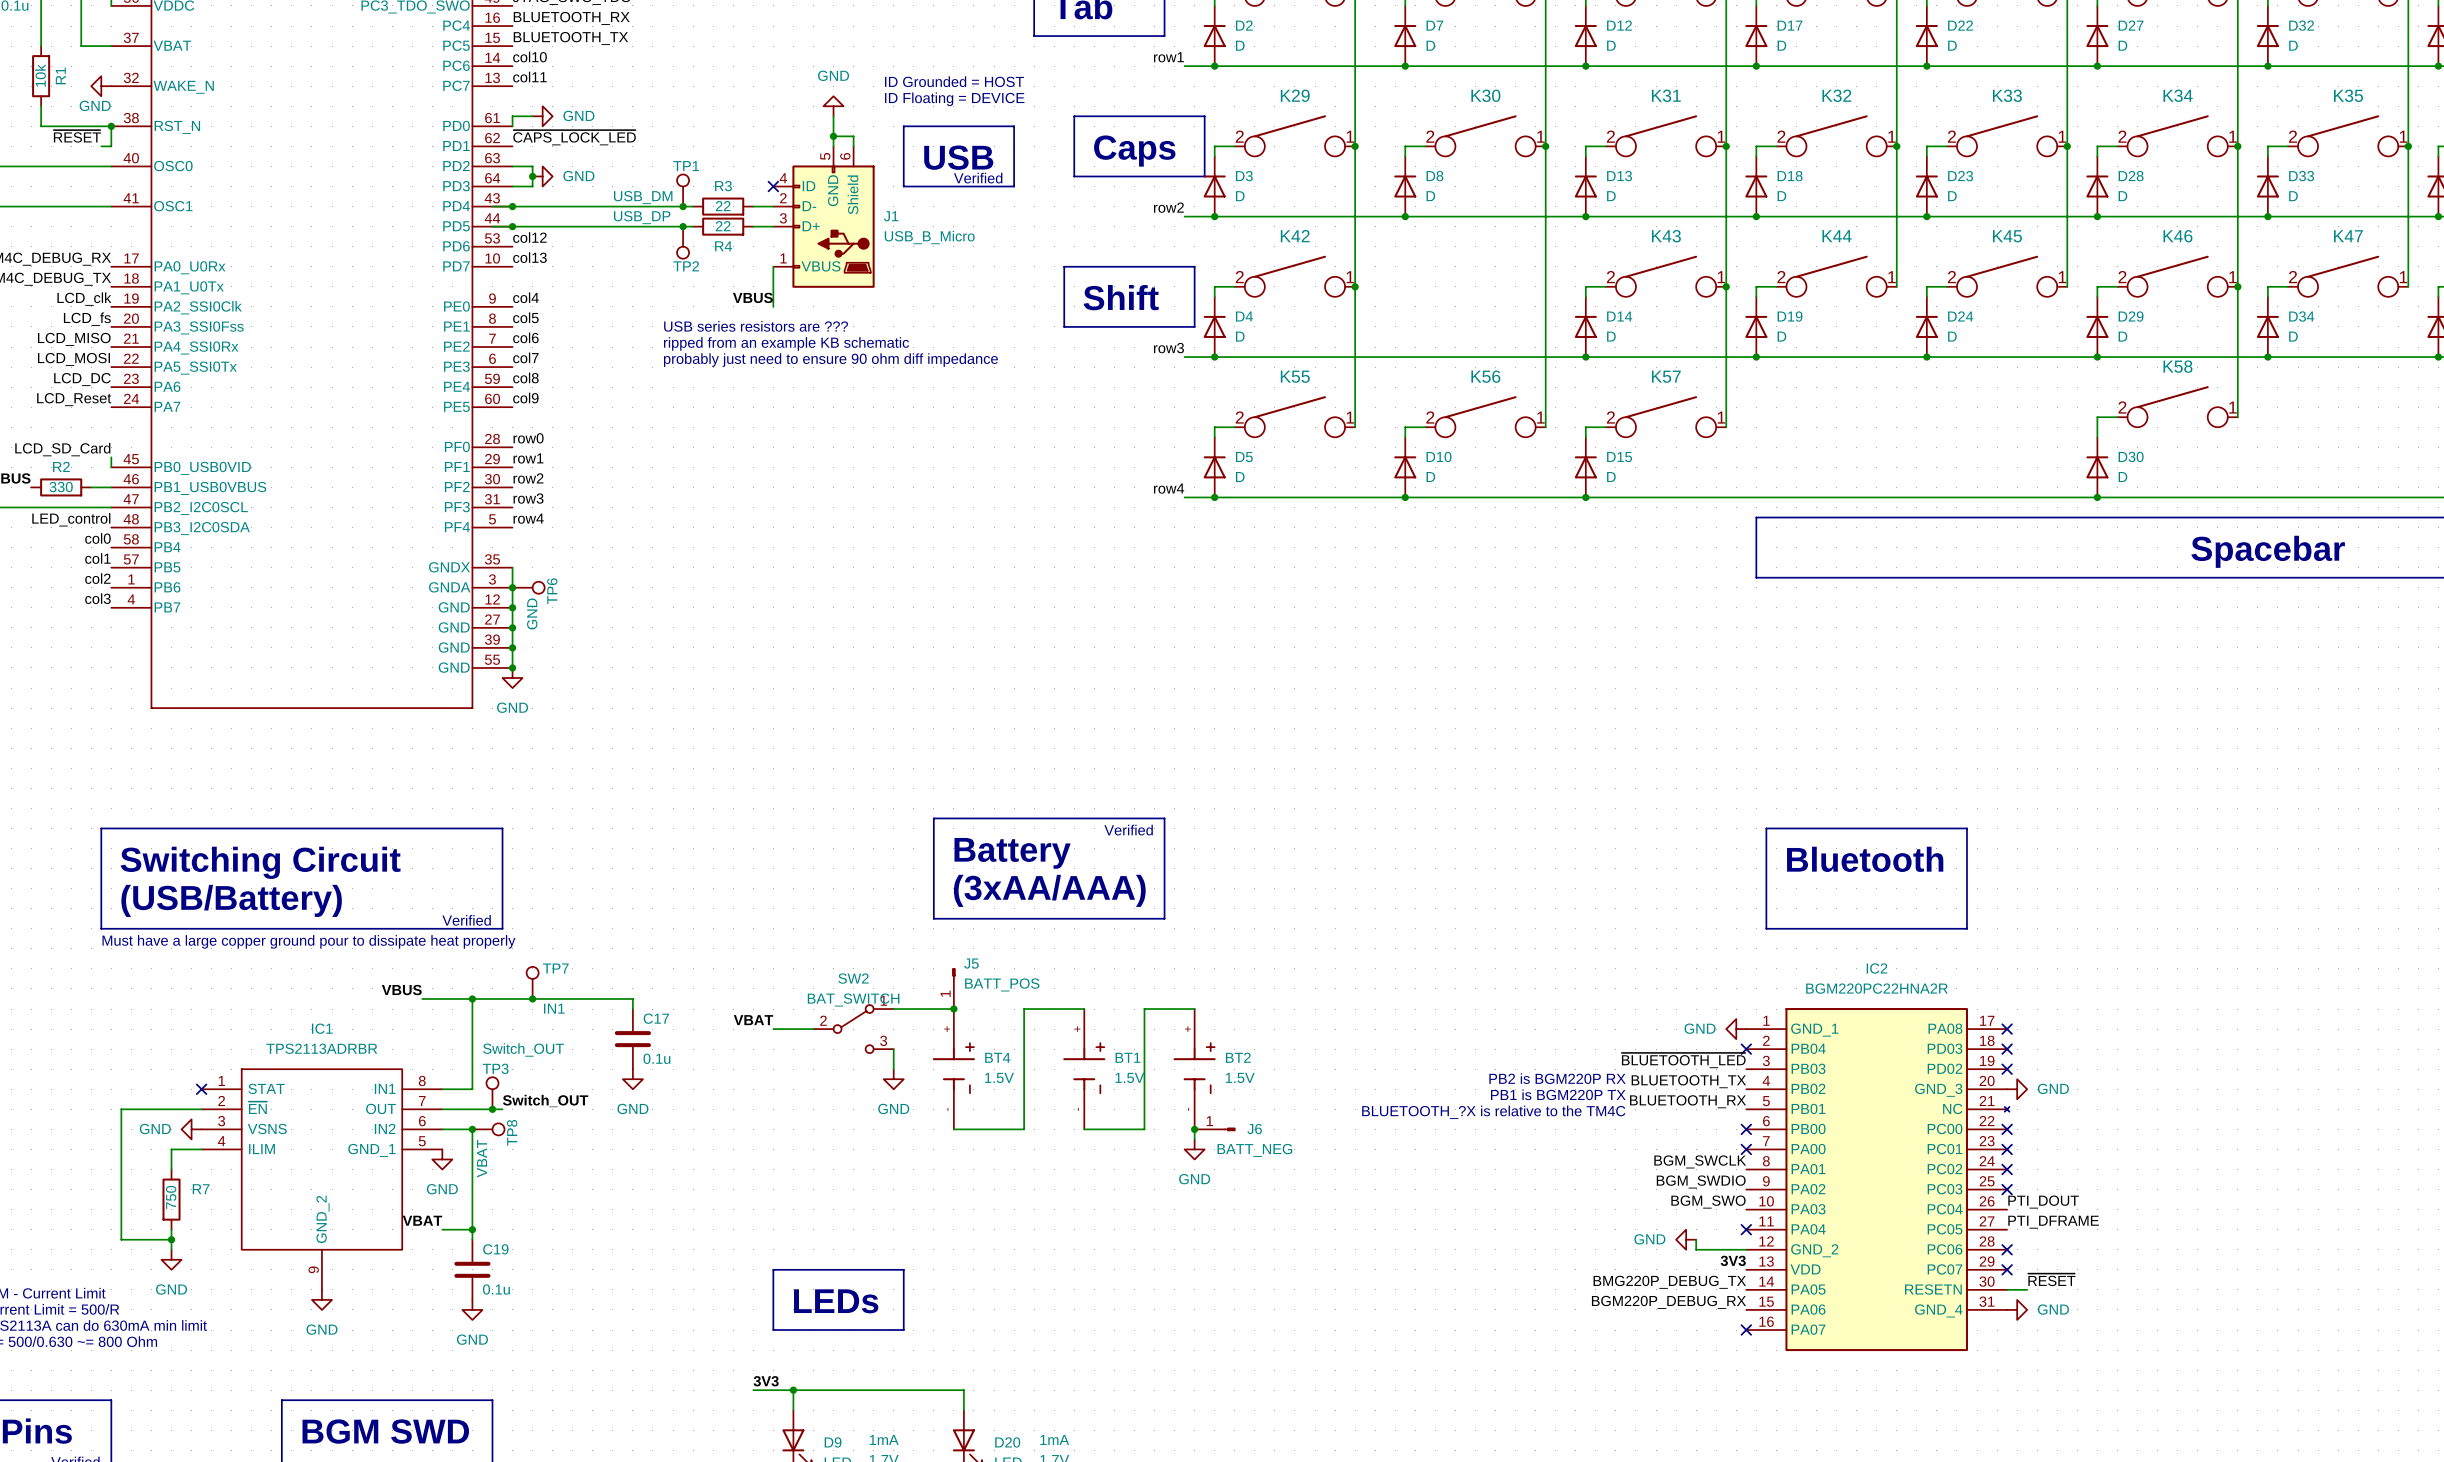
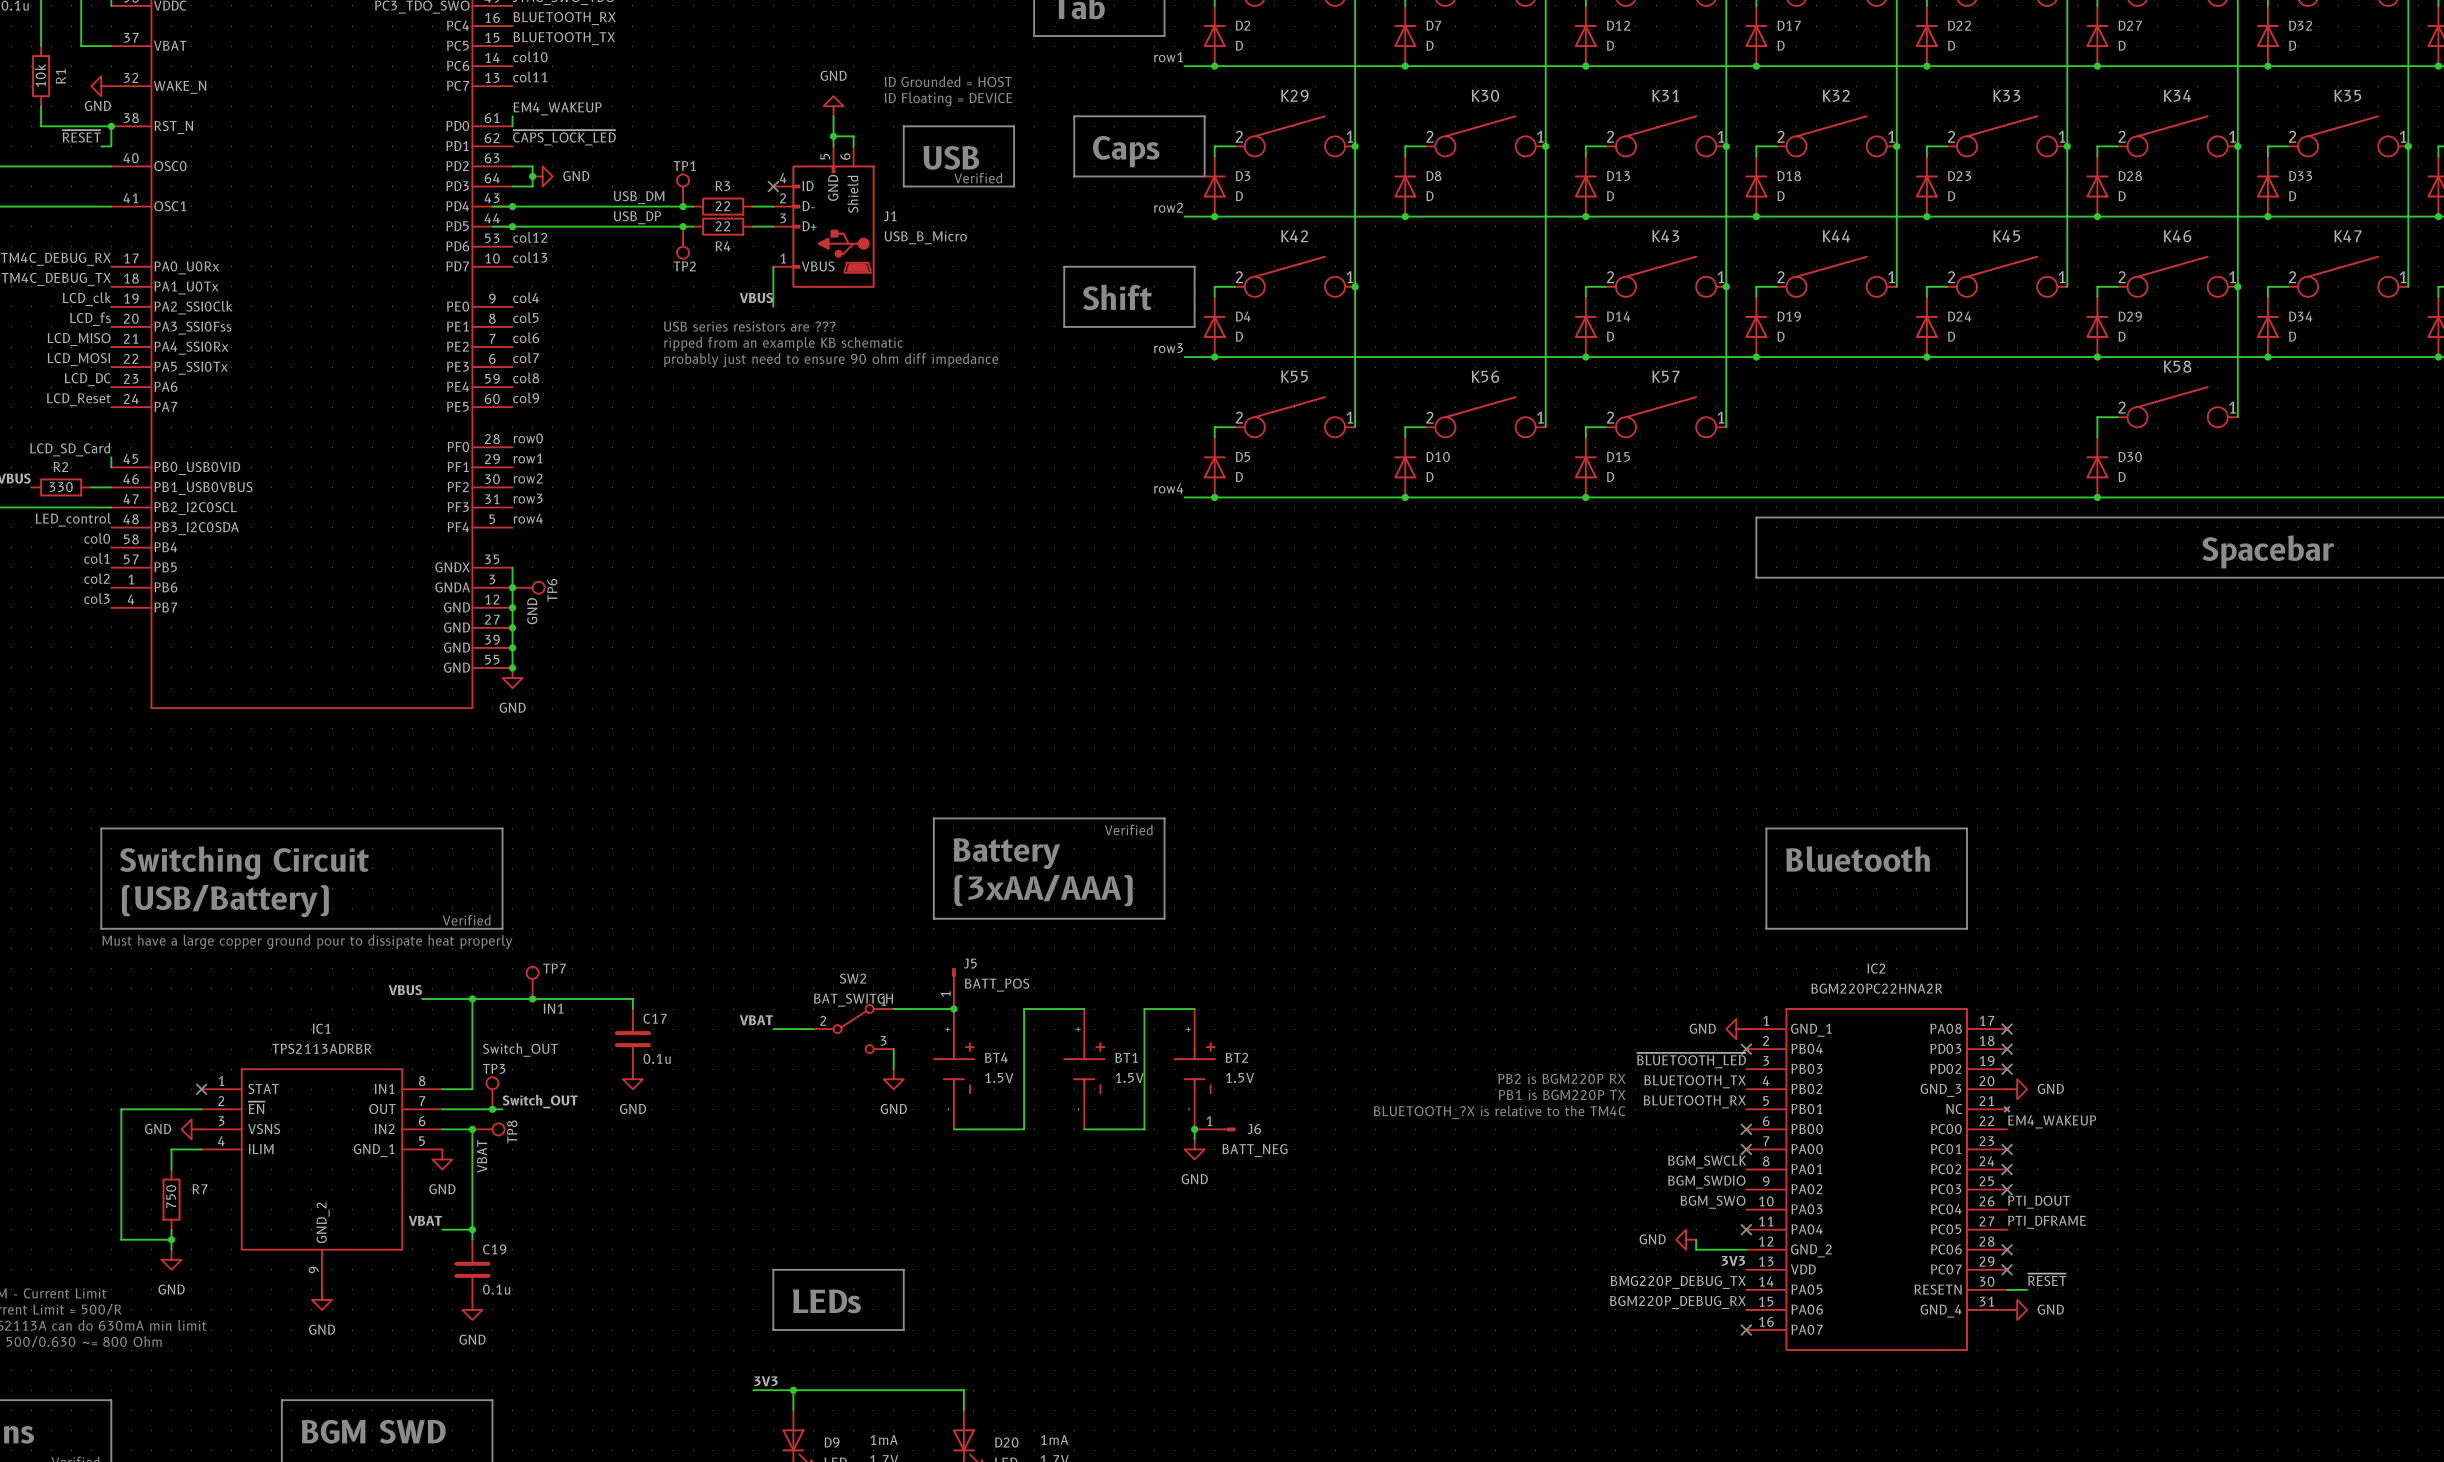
label: none -> EM4_WAKEUP (557, 108)
wire: (512, 116) (532, 116) -> none
power symbol: GND (542, 116) -> none
label: none -> EM4_WAKEUP (2052, 1121)
no-connect mark: (2007, 1129) -> none

